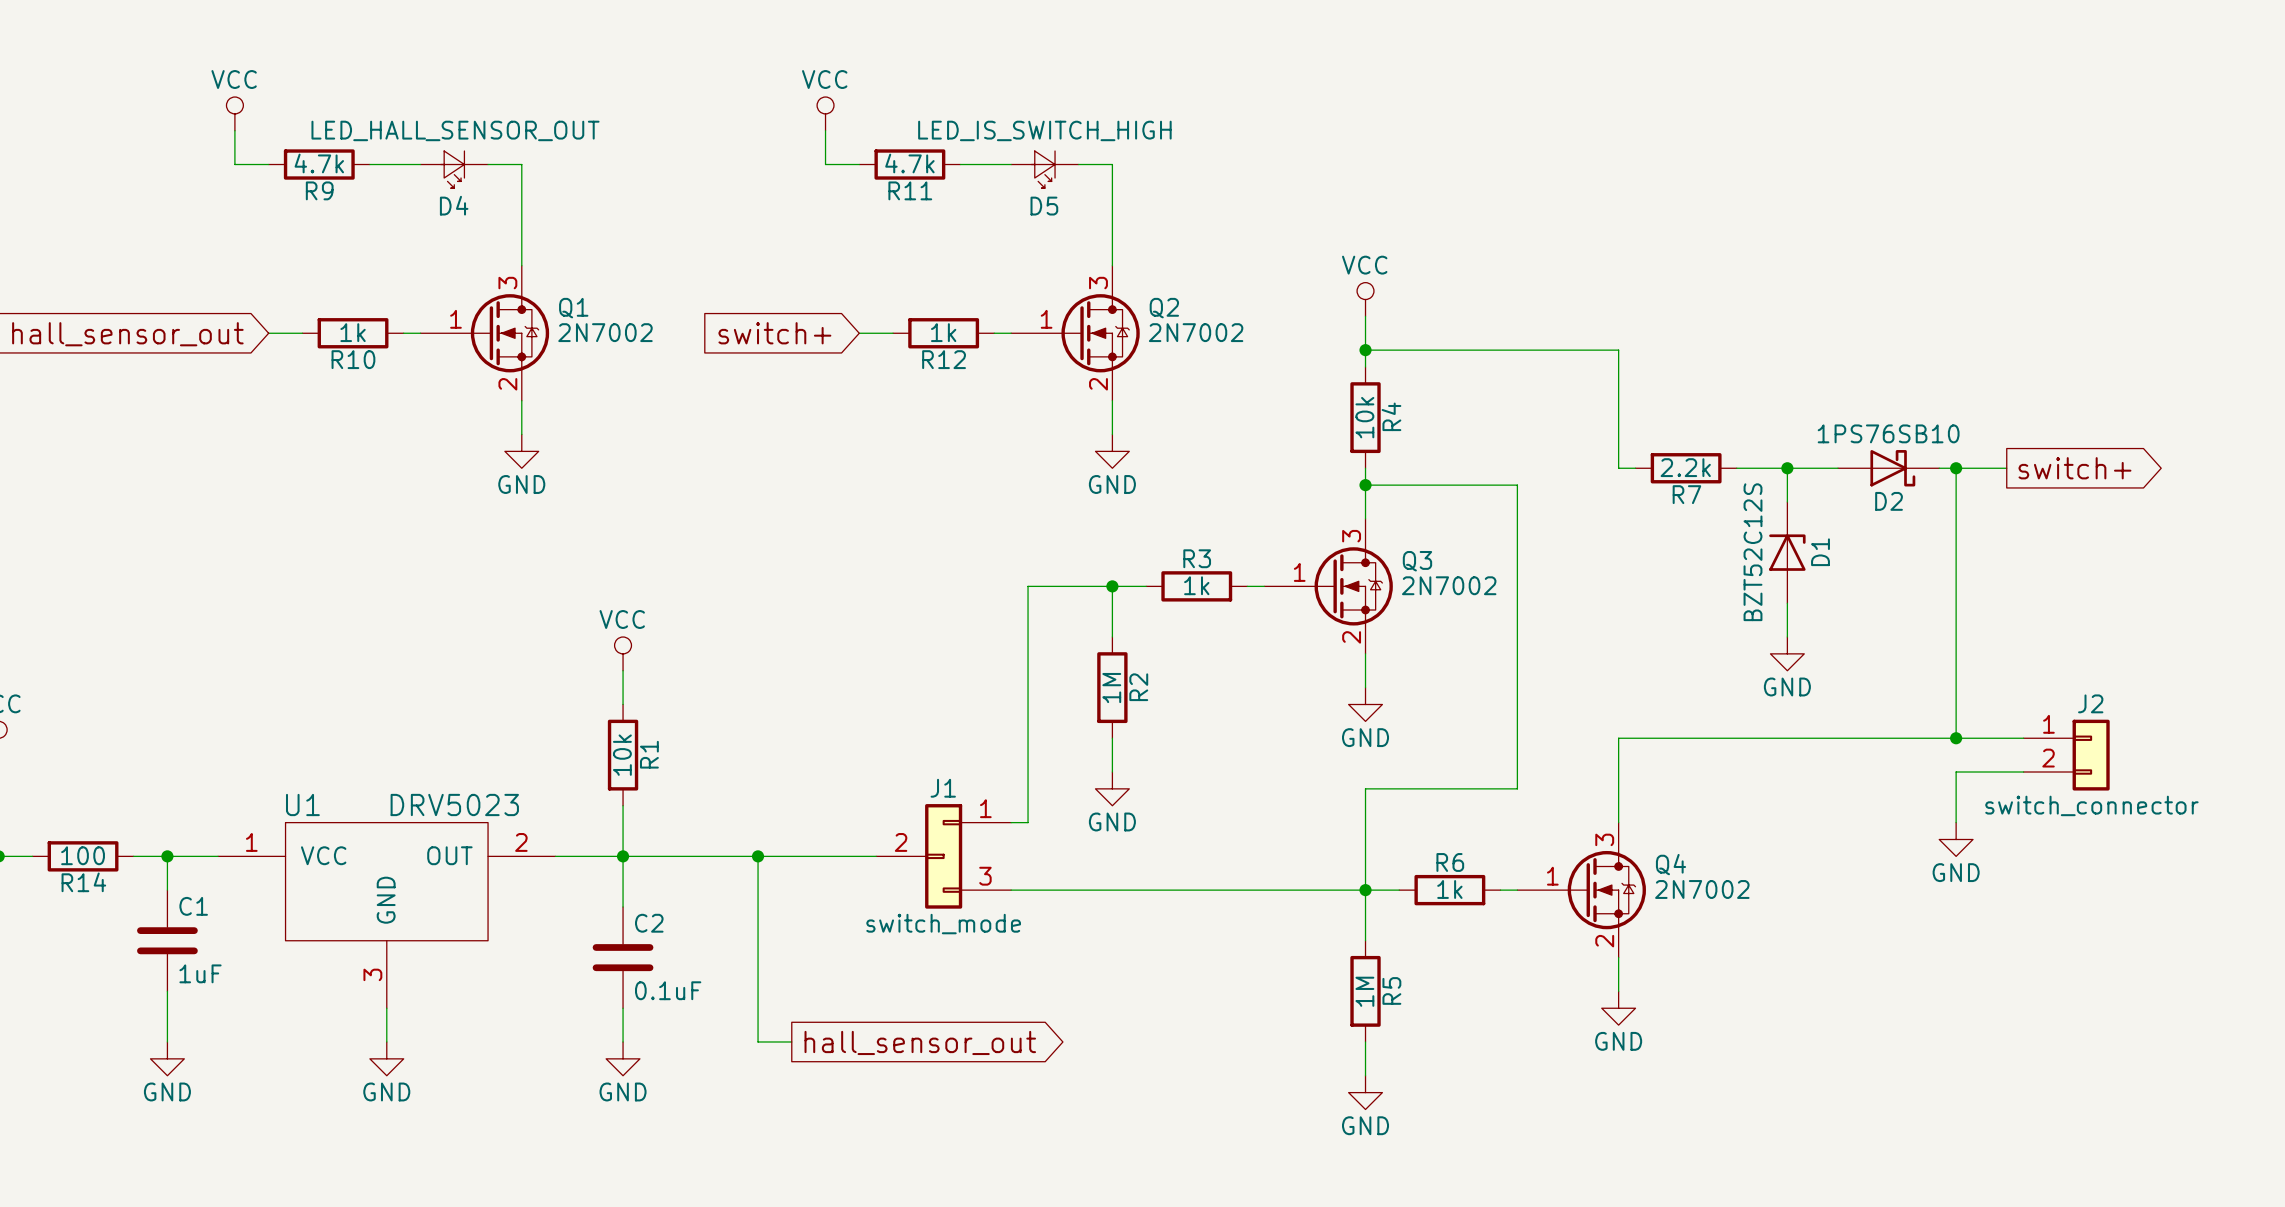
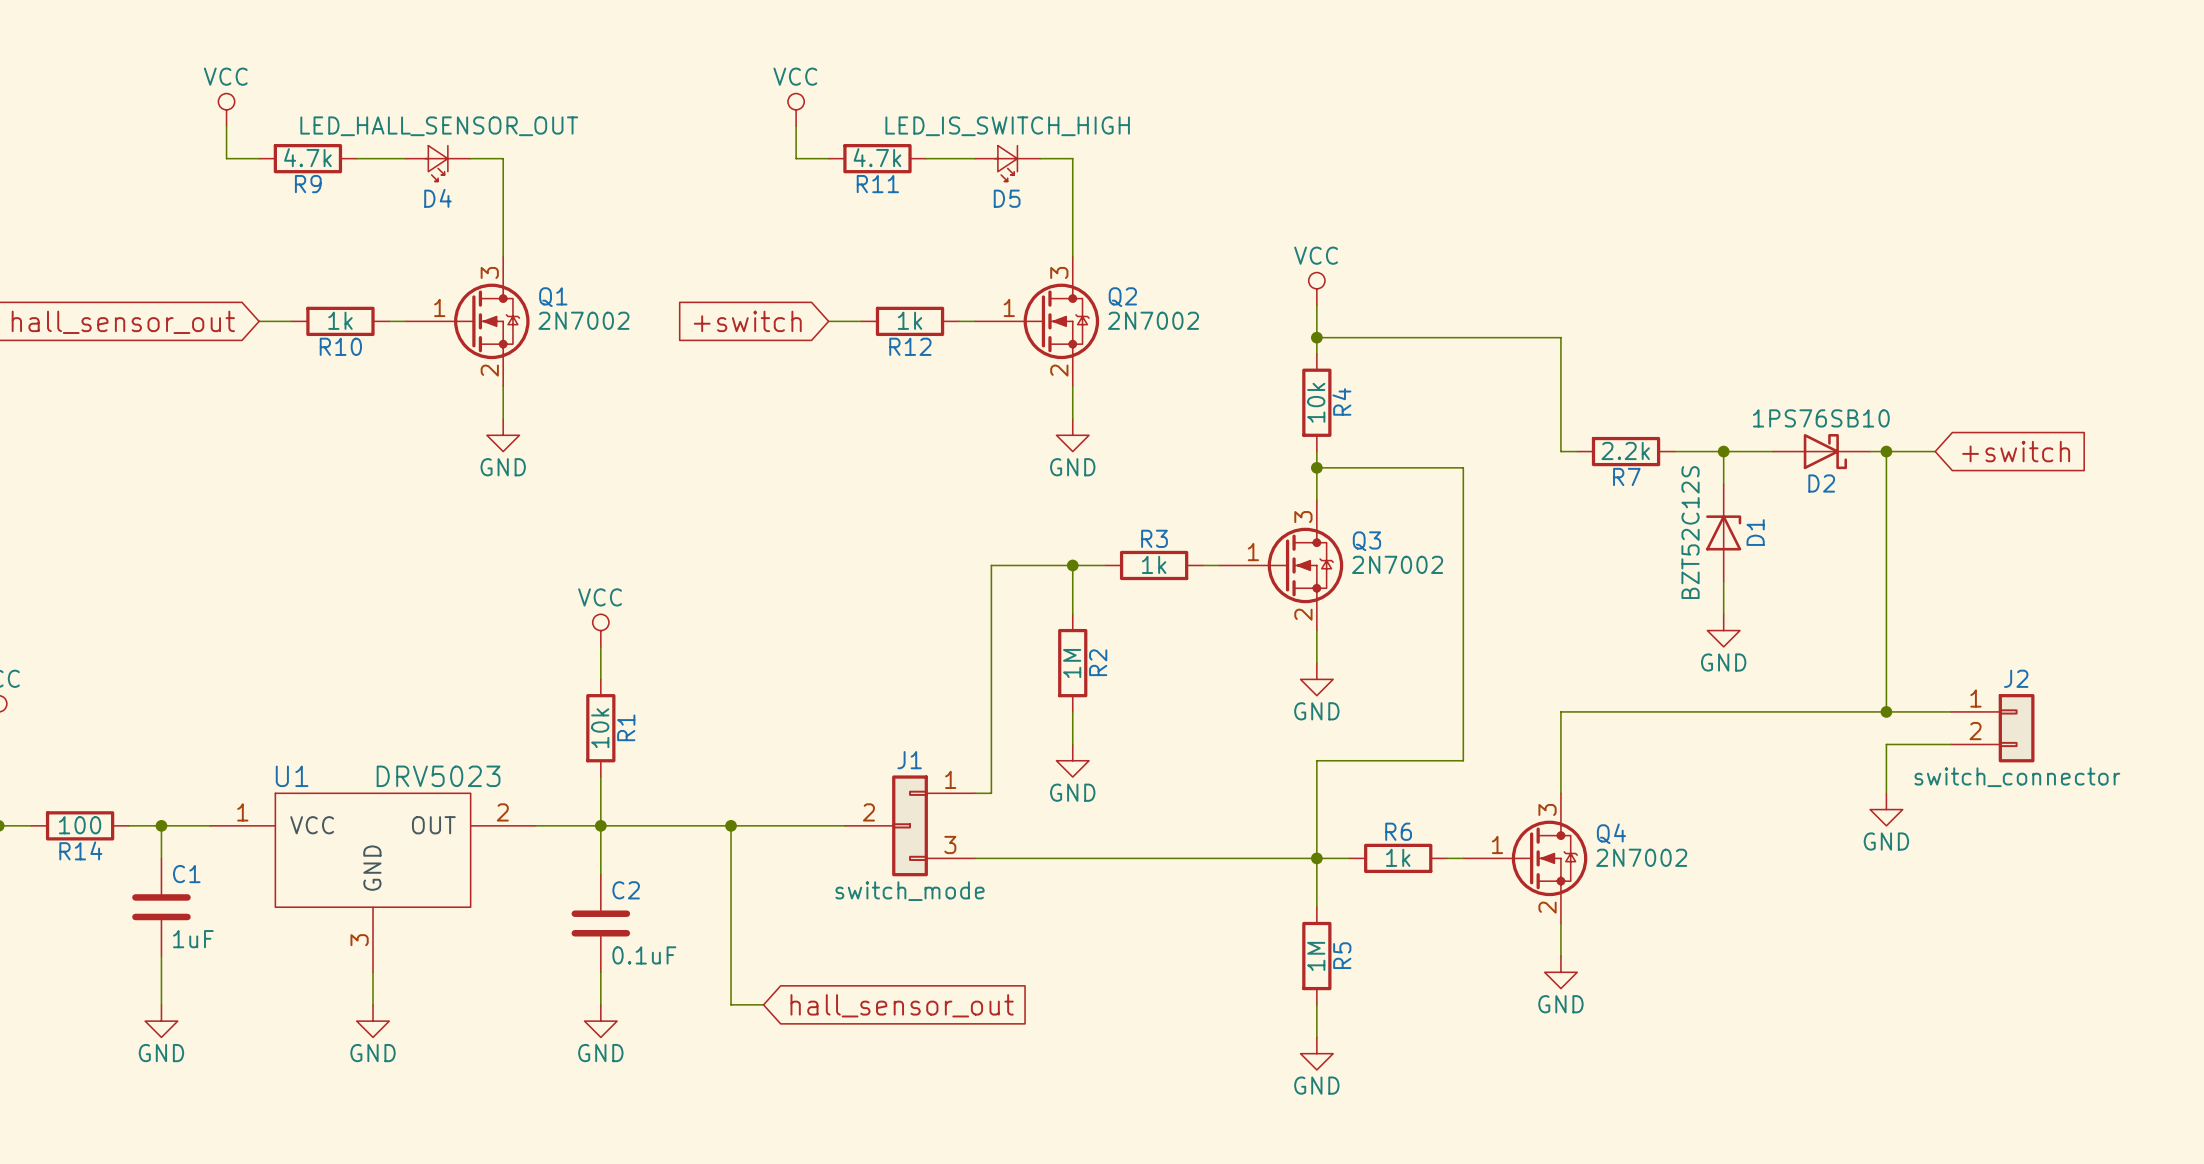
global label: switch+ (774, 333) -> +switch (747, 321)
global label shape: output (2074, 468) -> input (2016, 451)
global label: switch+ (2074, 468) -> +switch (2016, 451)
global label shape: output (920, 1042) -> input (902, 1005)

